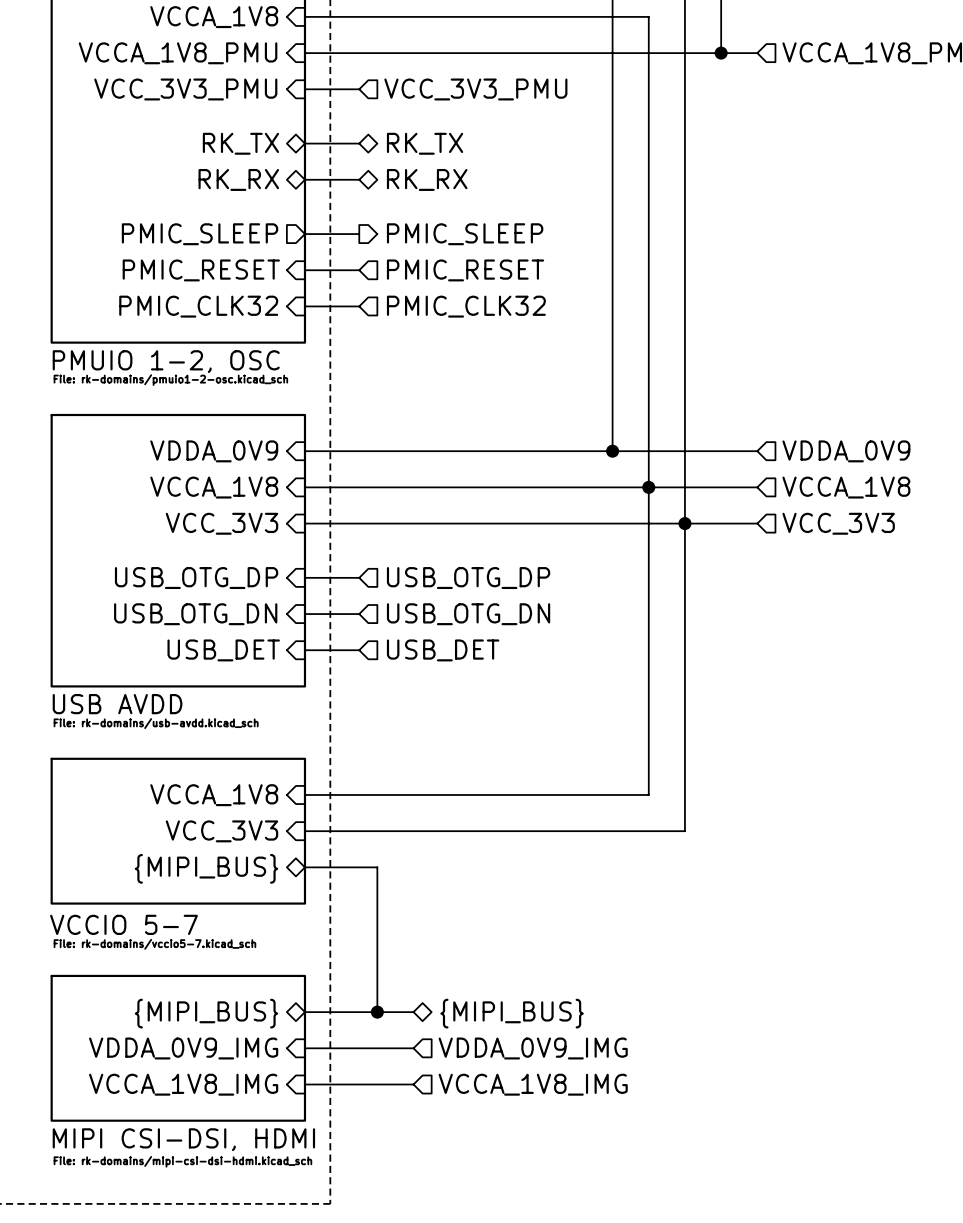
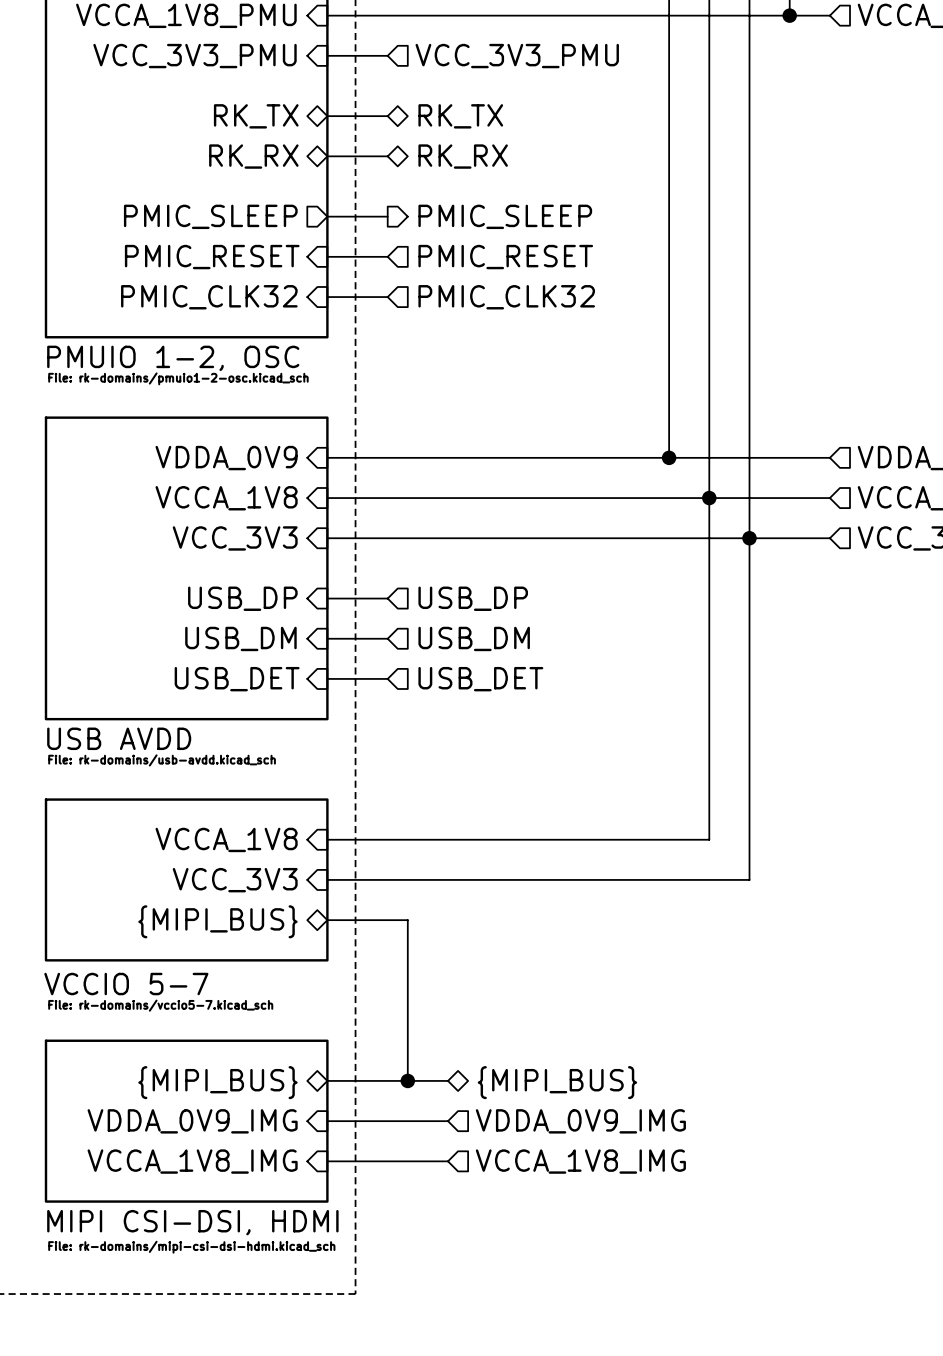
sheet pin: USB_OTG_DP (196, 578) -> USB_DP (242, 598)
hierarchical label: USB_OTG_DP (468, 578) -> USB_DP (473, 598)
sheet pin: USB_OTG_DN (195, 614) -> USB_DM (240, 638)
hierarchical label: USB_OTG_DN (468, 614) -> USB_DM (474, 638)

